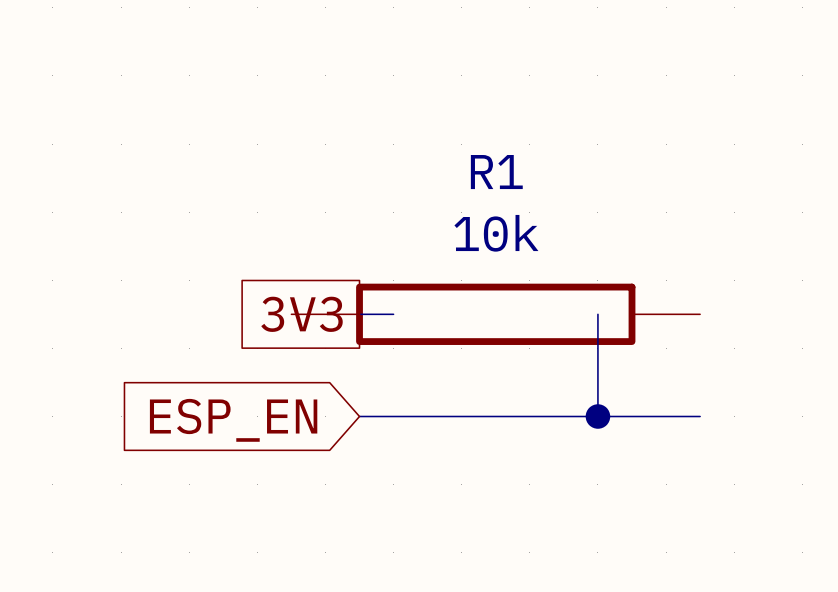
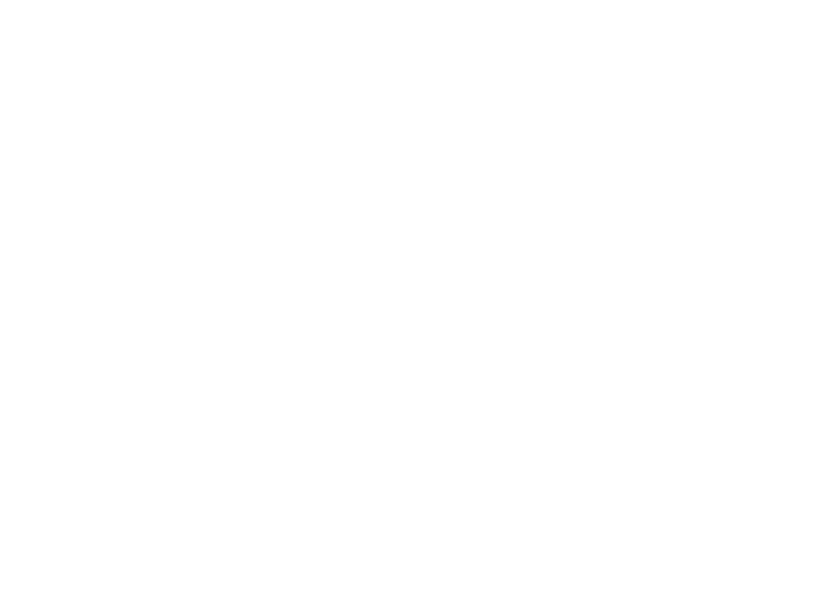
global label: 3V3 (301, 314) -> none
wire: (359, 314) (393, 314) -> none
R1: 10k (495, 314) -> none
wire: (597, 314) (597, 416) -> none
wire: (359, 416) (700, 416) -> none
junction: (597, 416) -> none
global label: ESP_EN (233, 420) -> none

